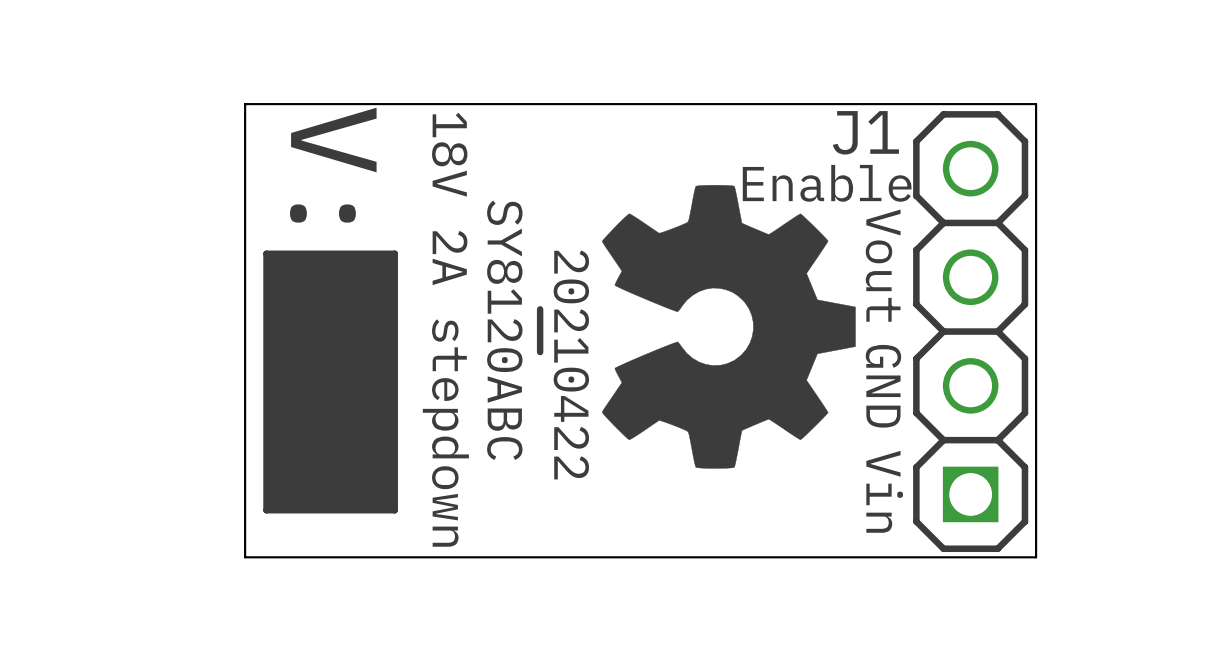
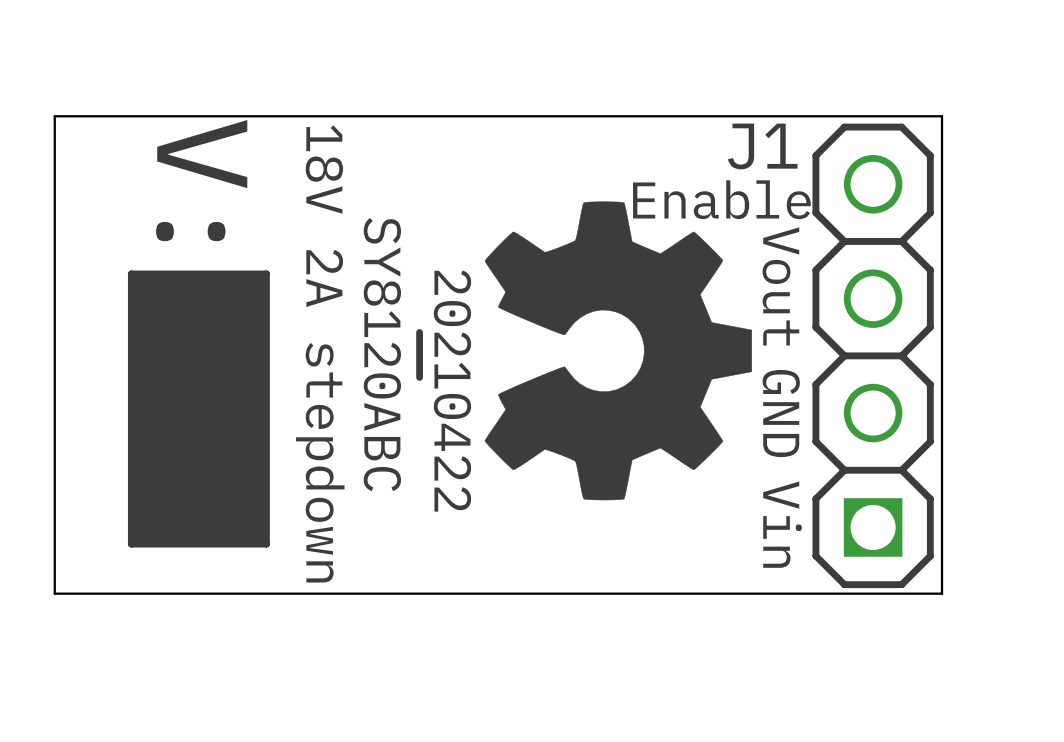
board edge: (245, 104) (245, 557) -> (108, 116) (54, 116) (54, 593) (108, 593)

